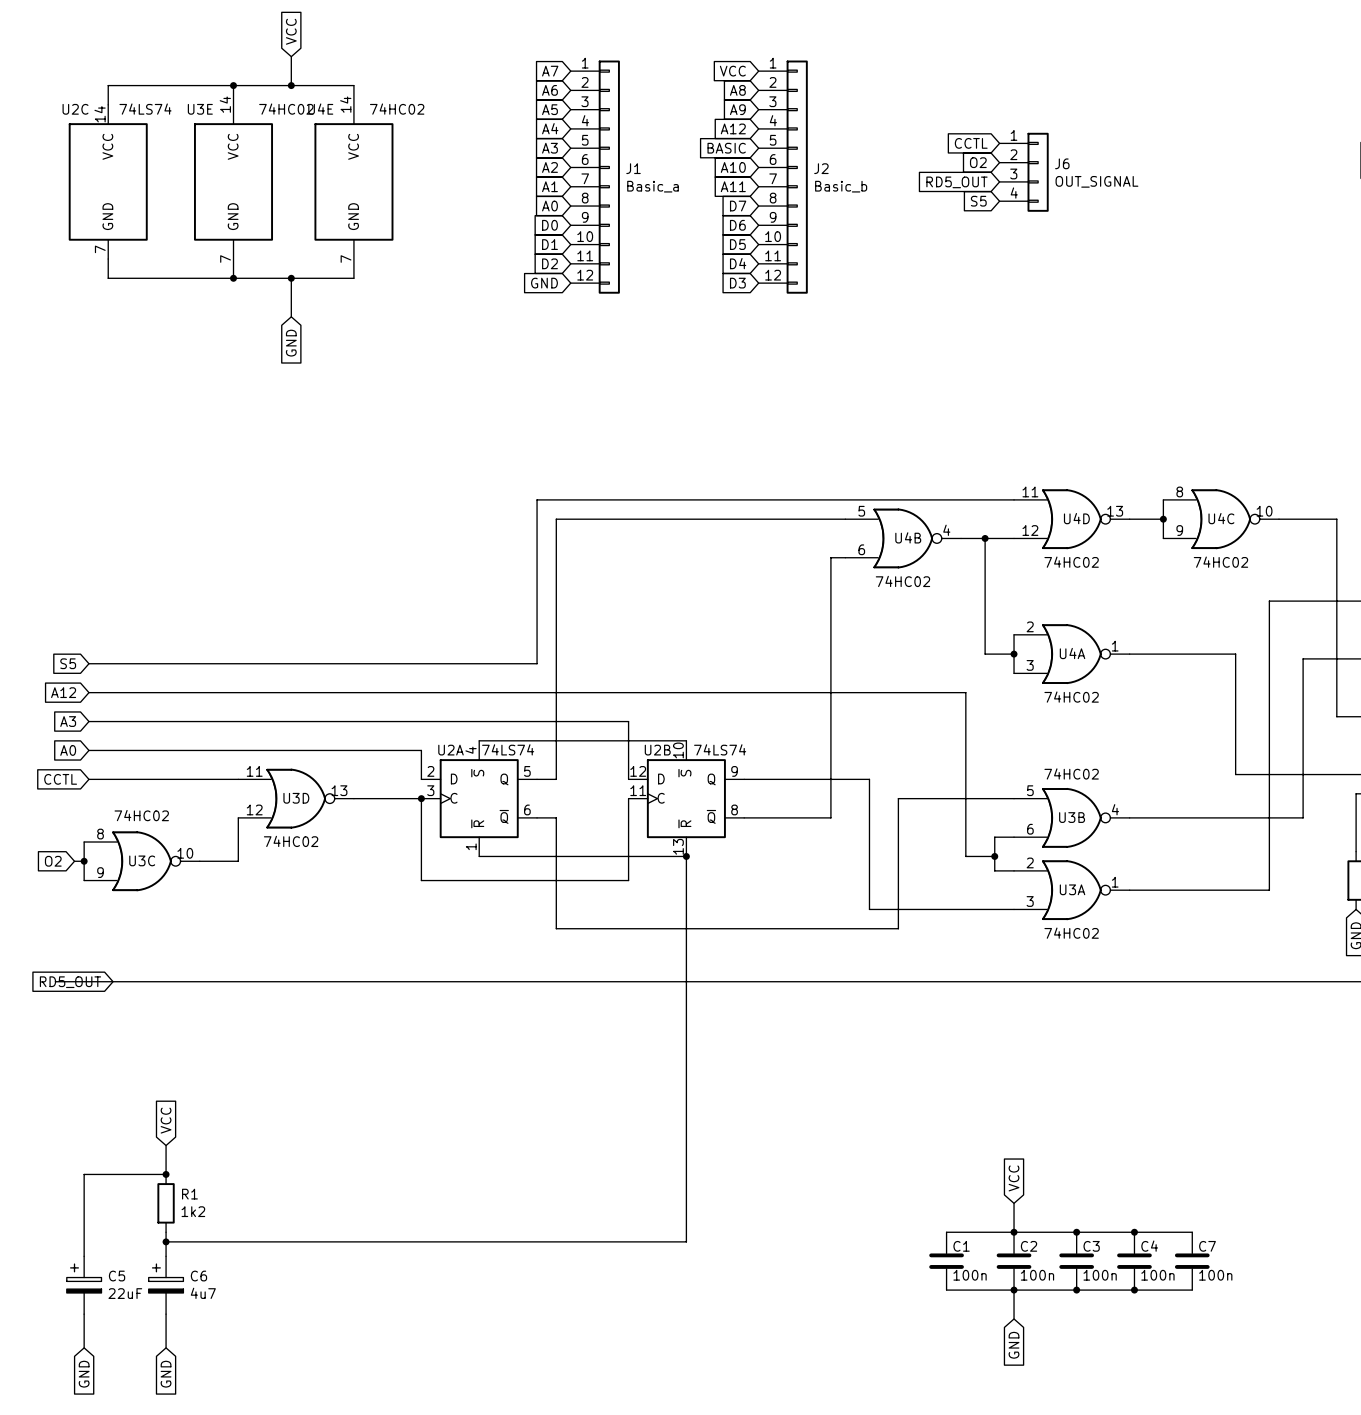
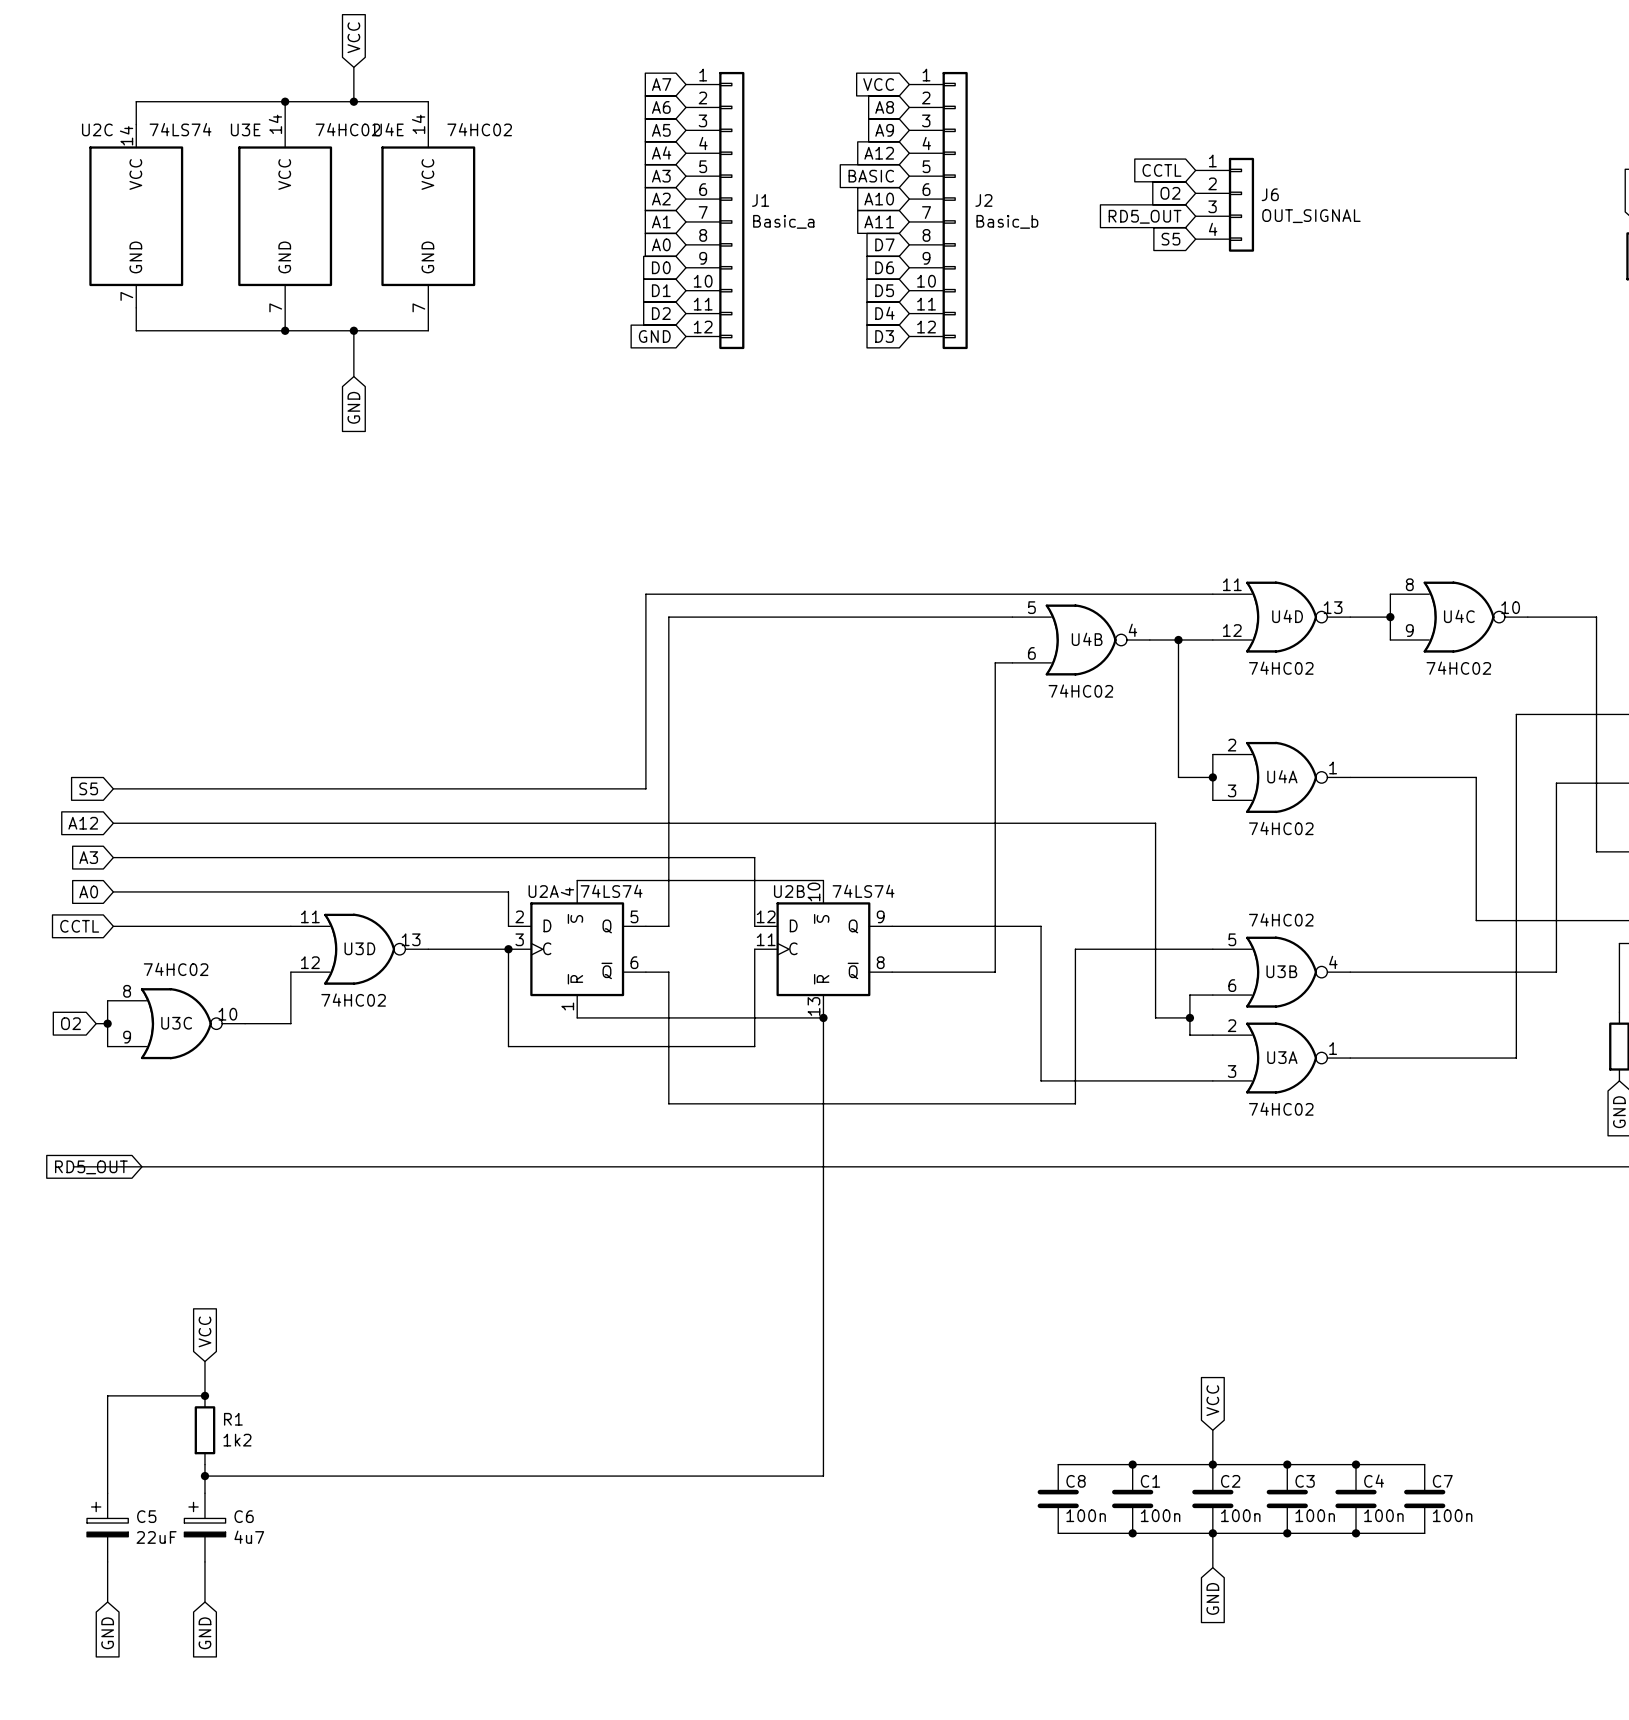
wire: none -> (1058, 1464) (1132, 1464)
junction: none -> (1132, 1464)
C8: none -> 100n (1058, 1498)
wire: none -> (1058, 1533) (1132, 1533)
junction: none -> (1132, 1533)

